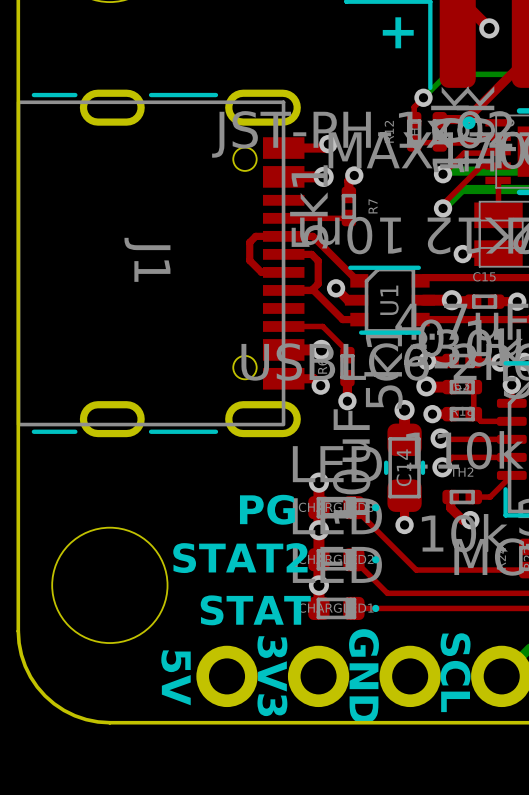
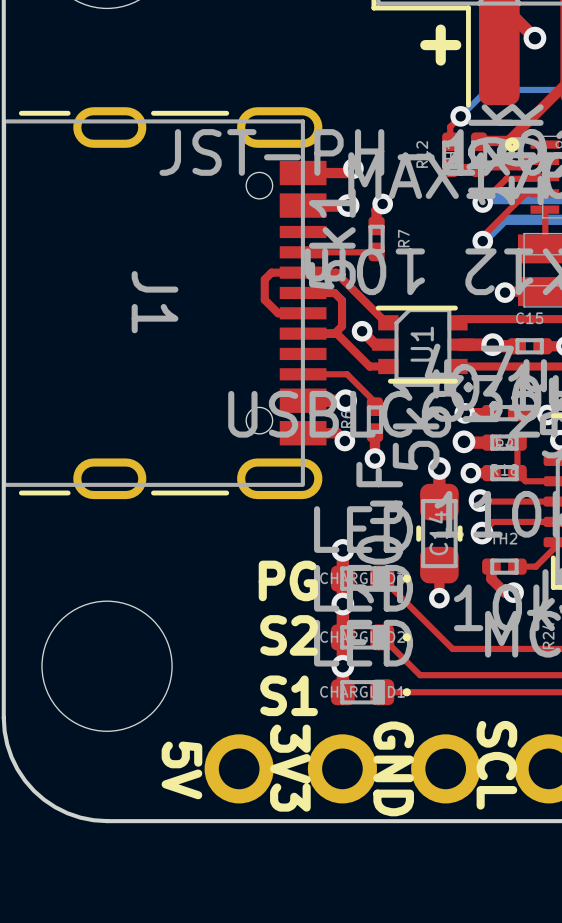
text: STAT2 (240, 558) -> none
text: none -> S2 (289, 635)
text: STAT (255, 610) -> none
text: none -> S1 (289, 695)

